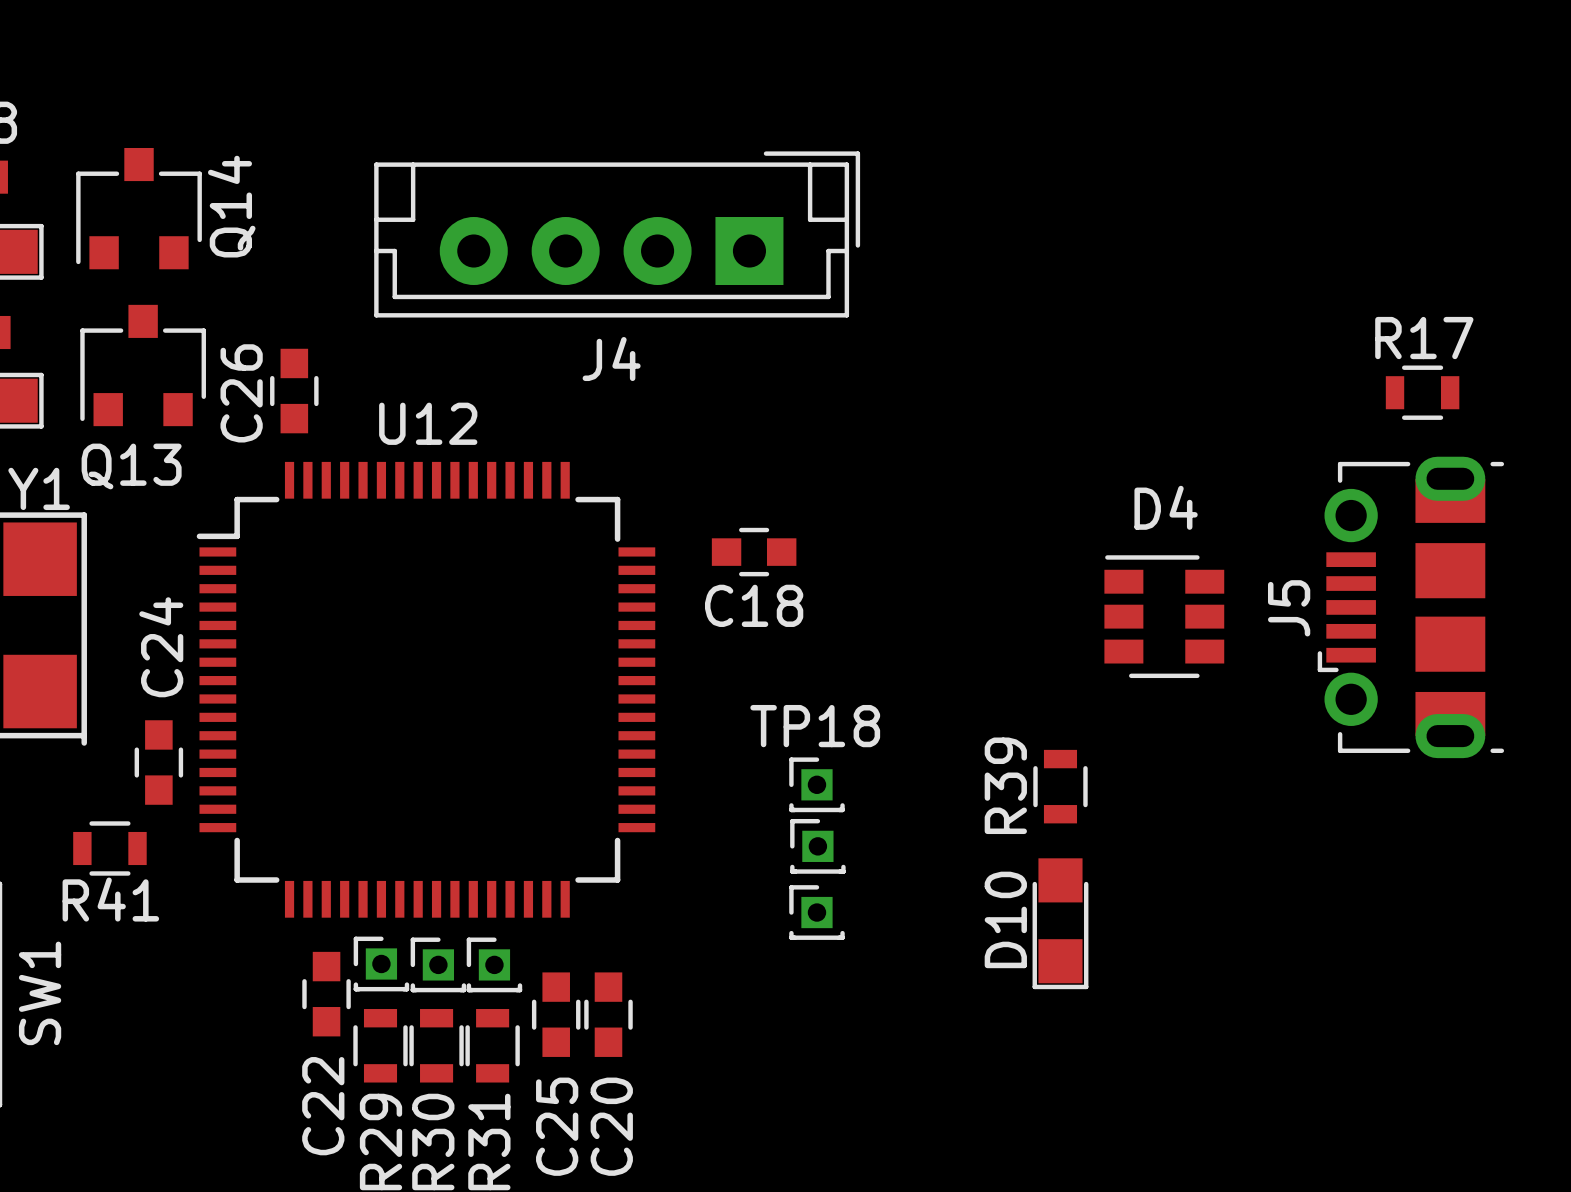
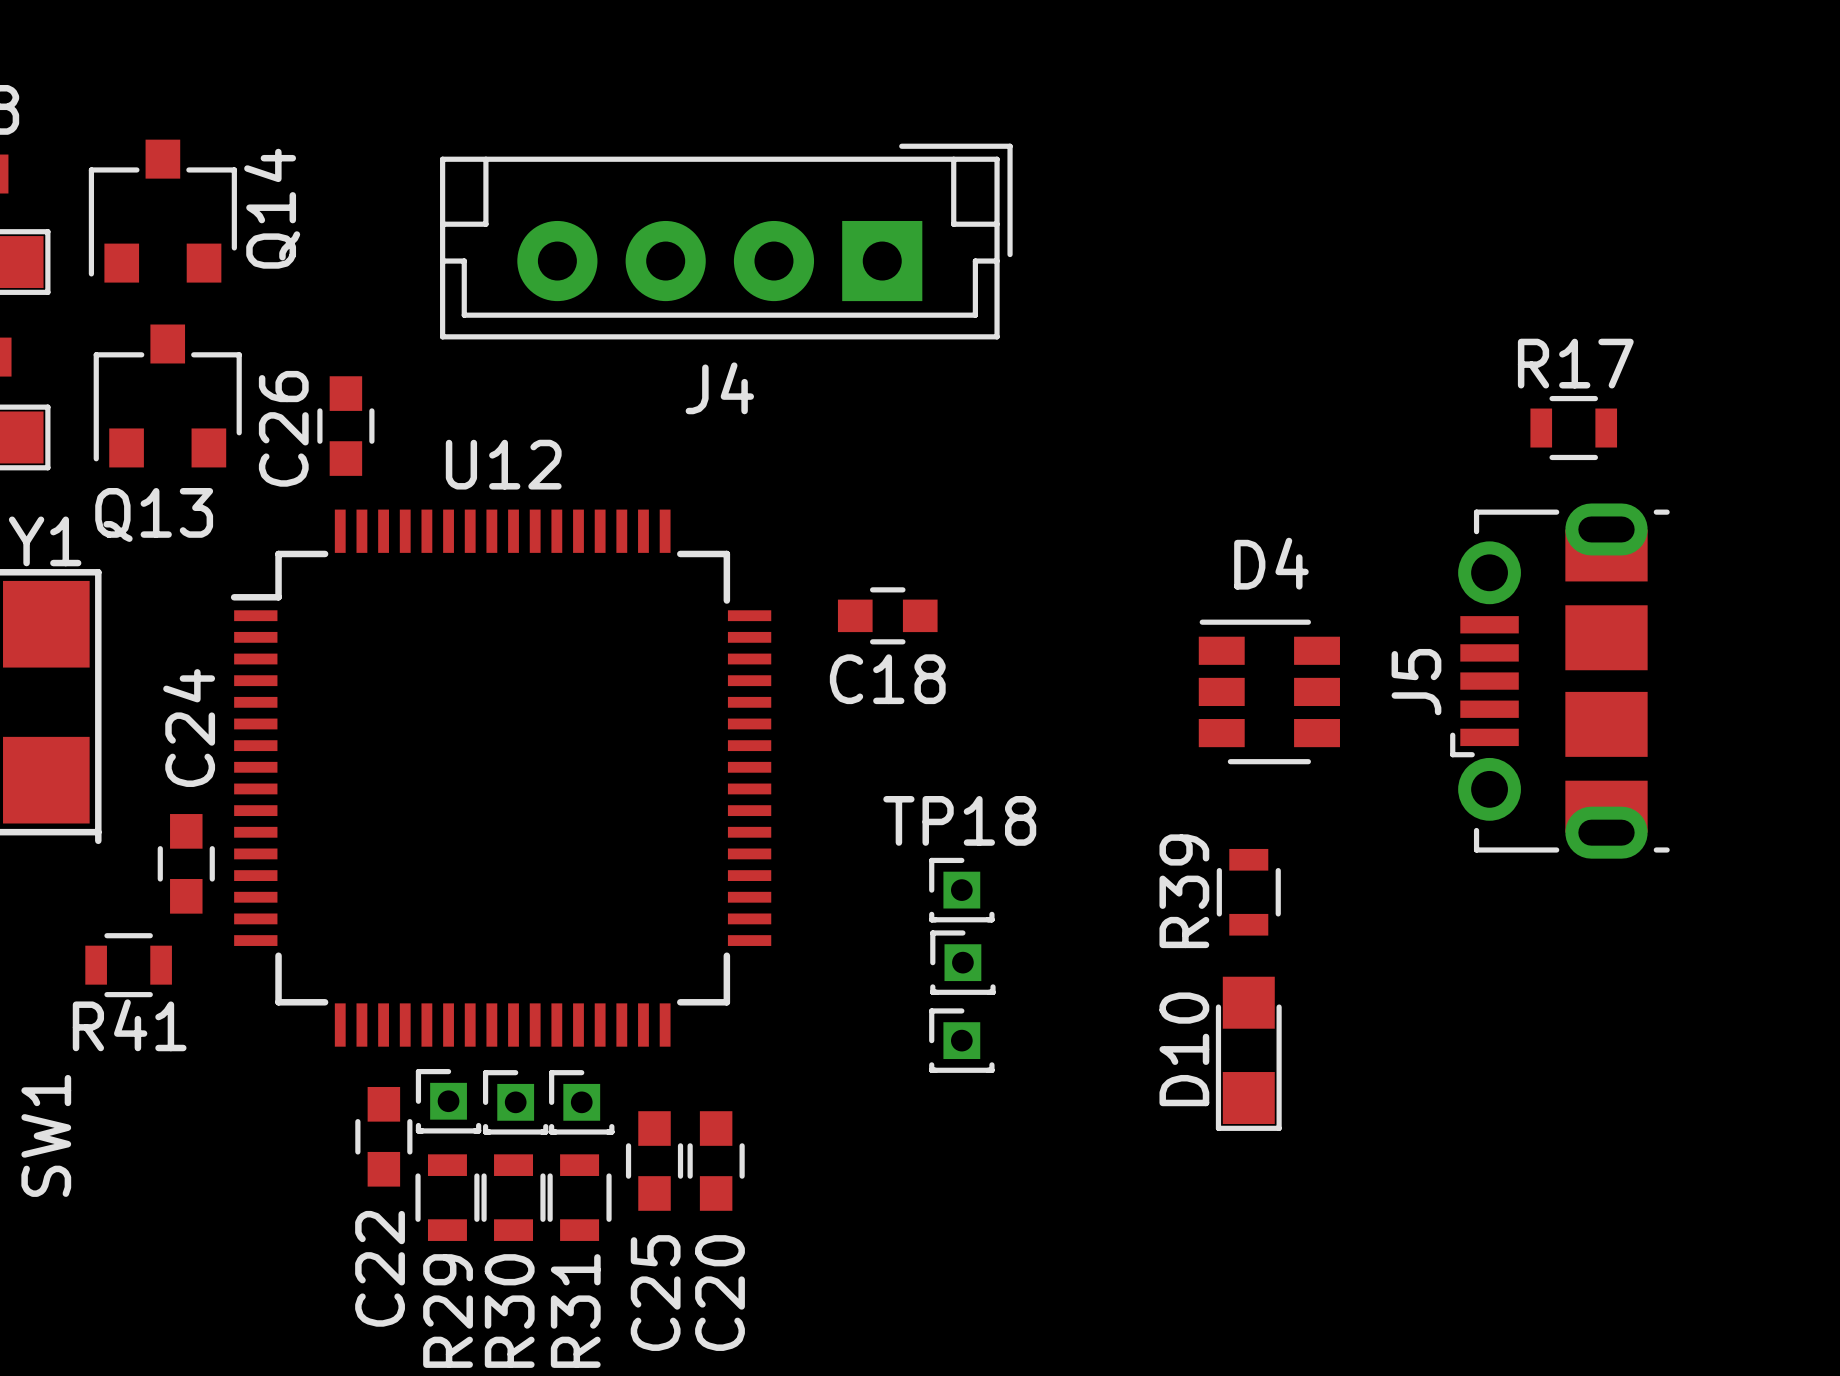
R17 position: (1422, 392) -> (1573, 428)
J5 position: (1410, 607) -> (1559, 681)
D4 position: (1164, 616) -> (1269, 691)

